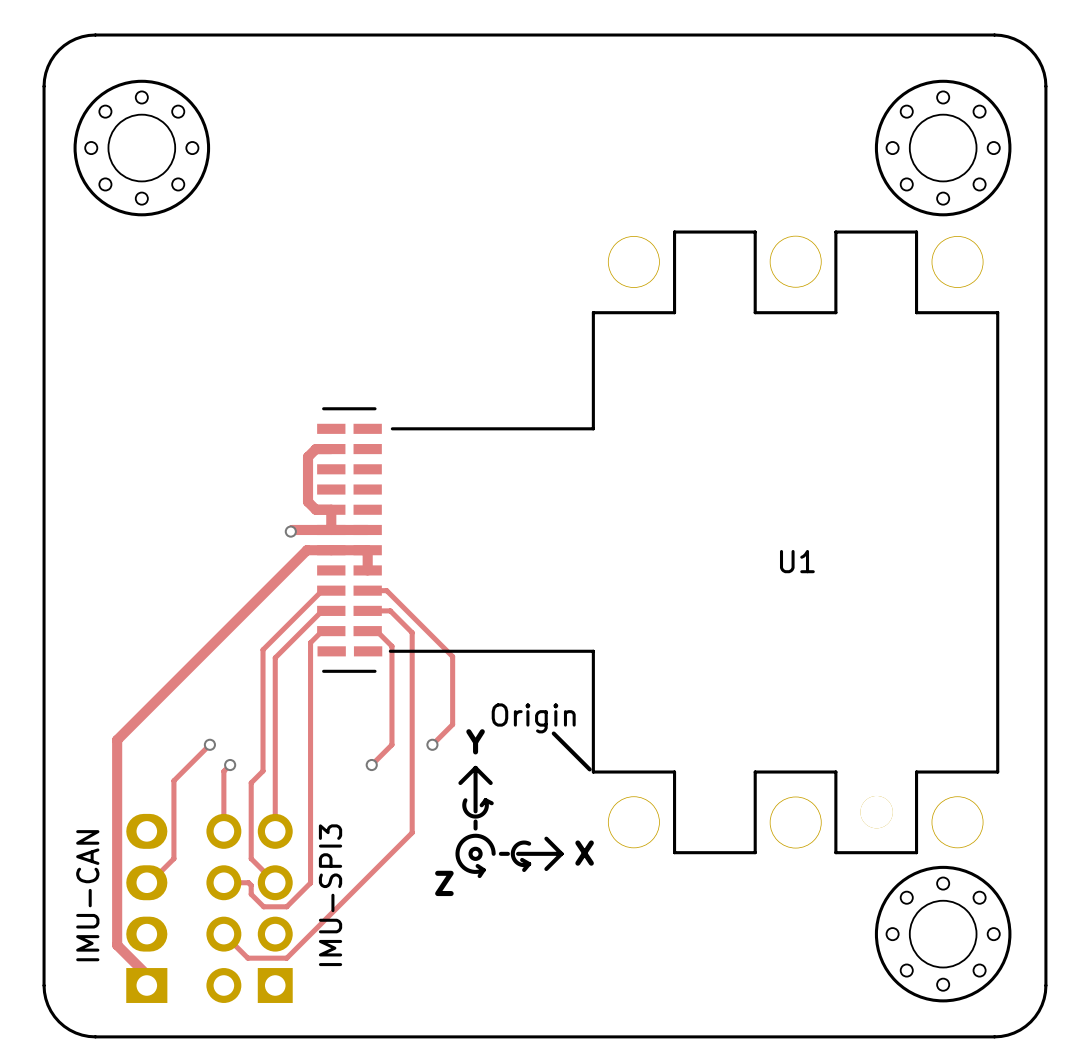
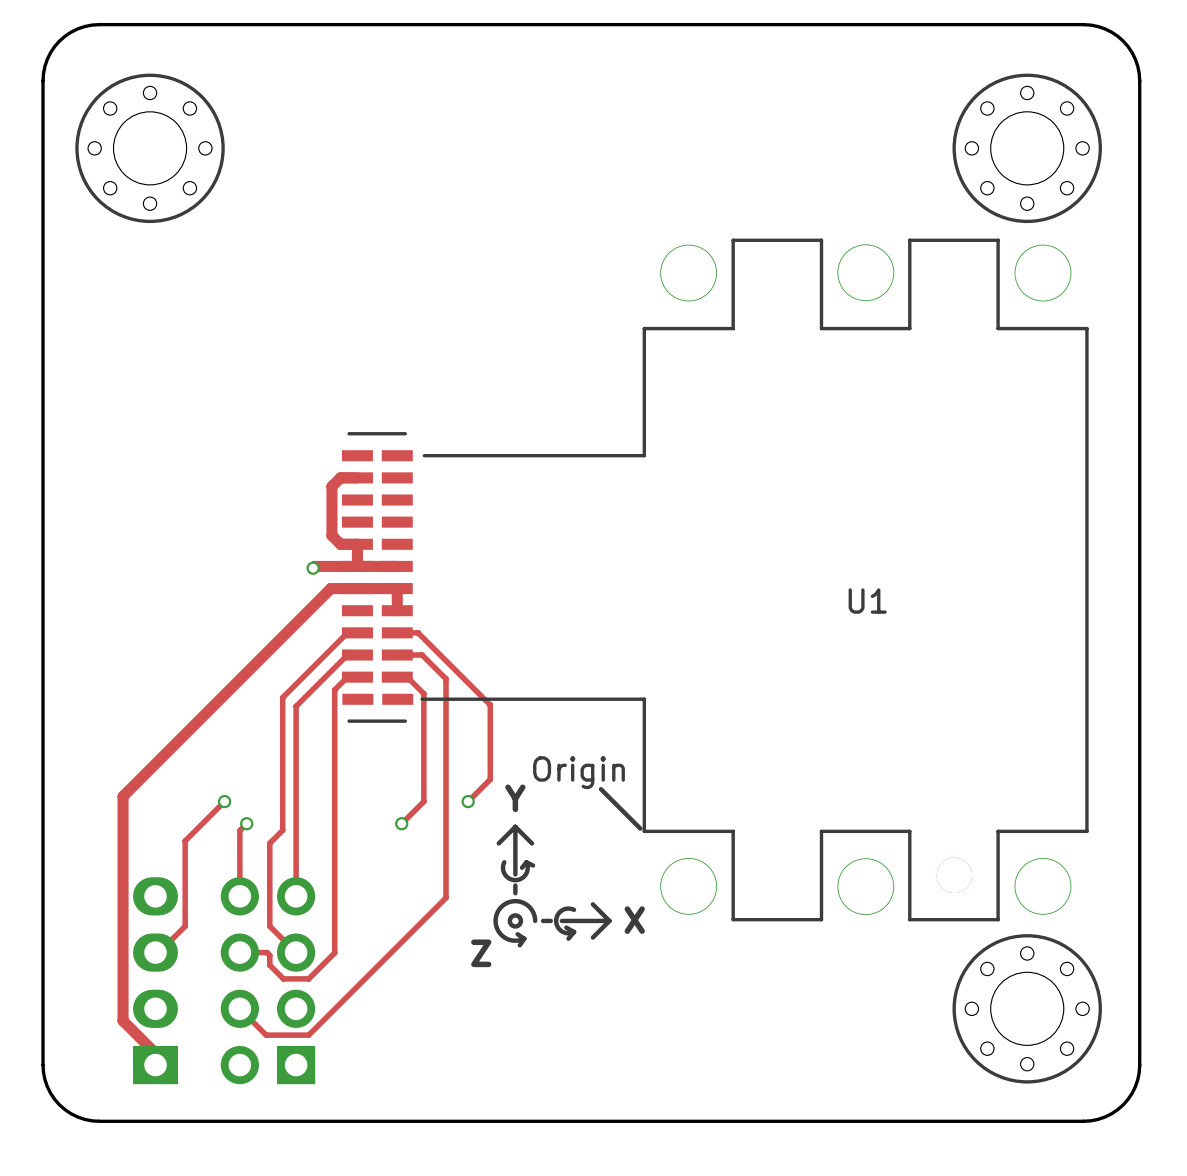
part value: IMU-CAN (87, 895) -> none
part value: IMU-SPI3 (330, 895) -> none

